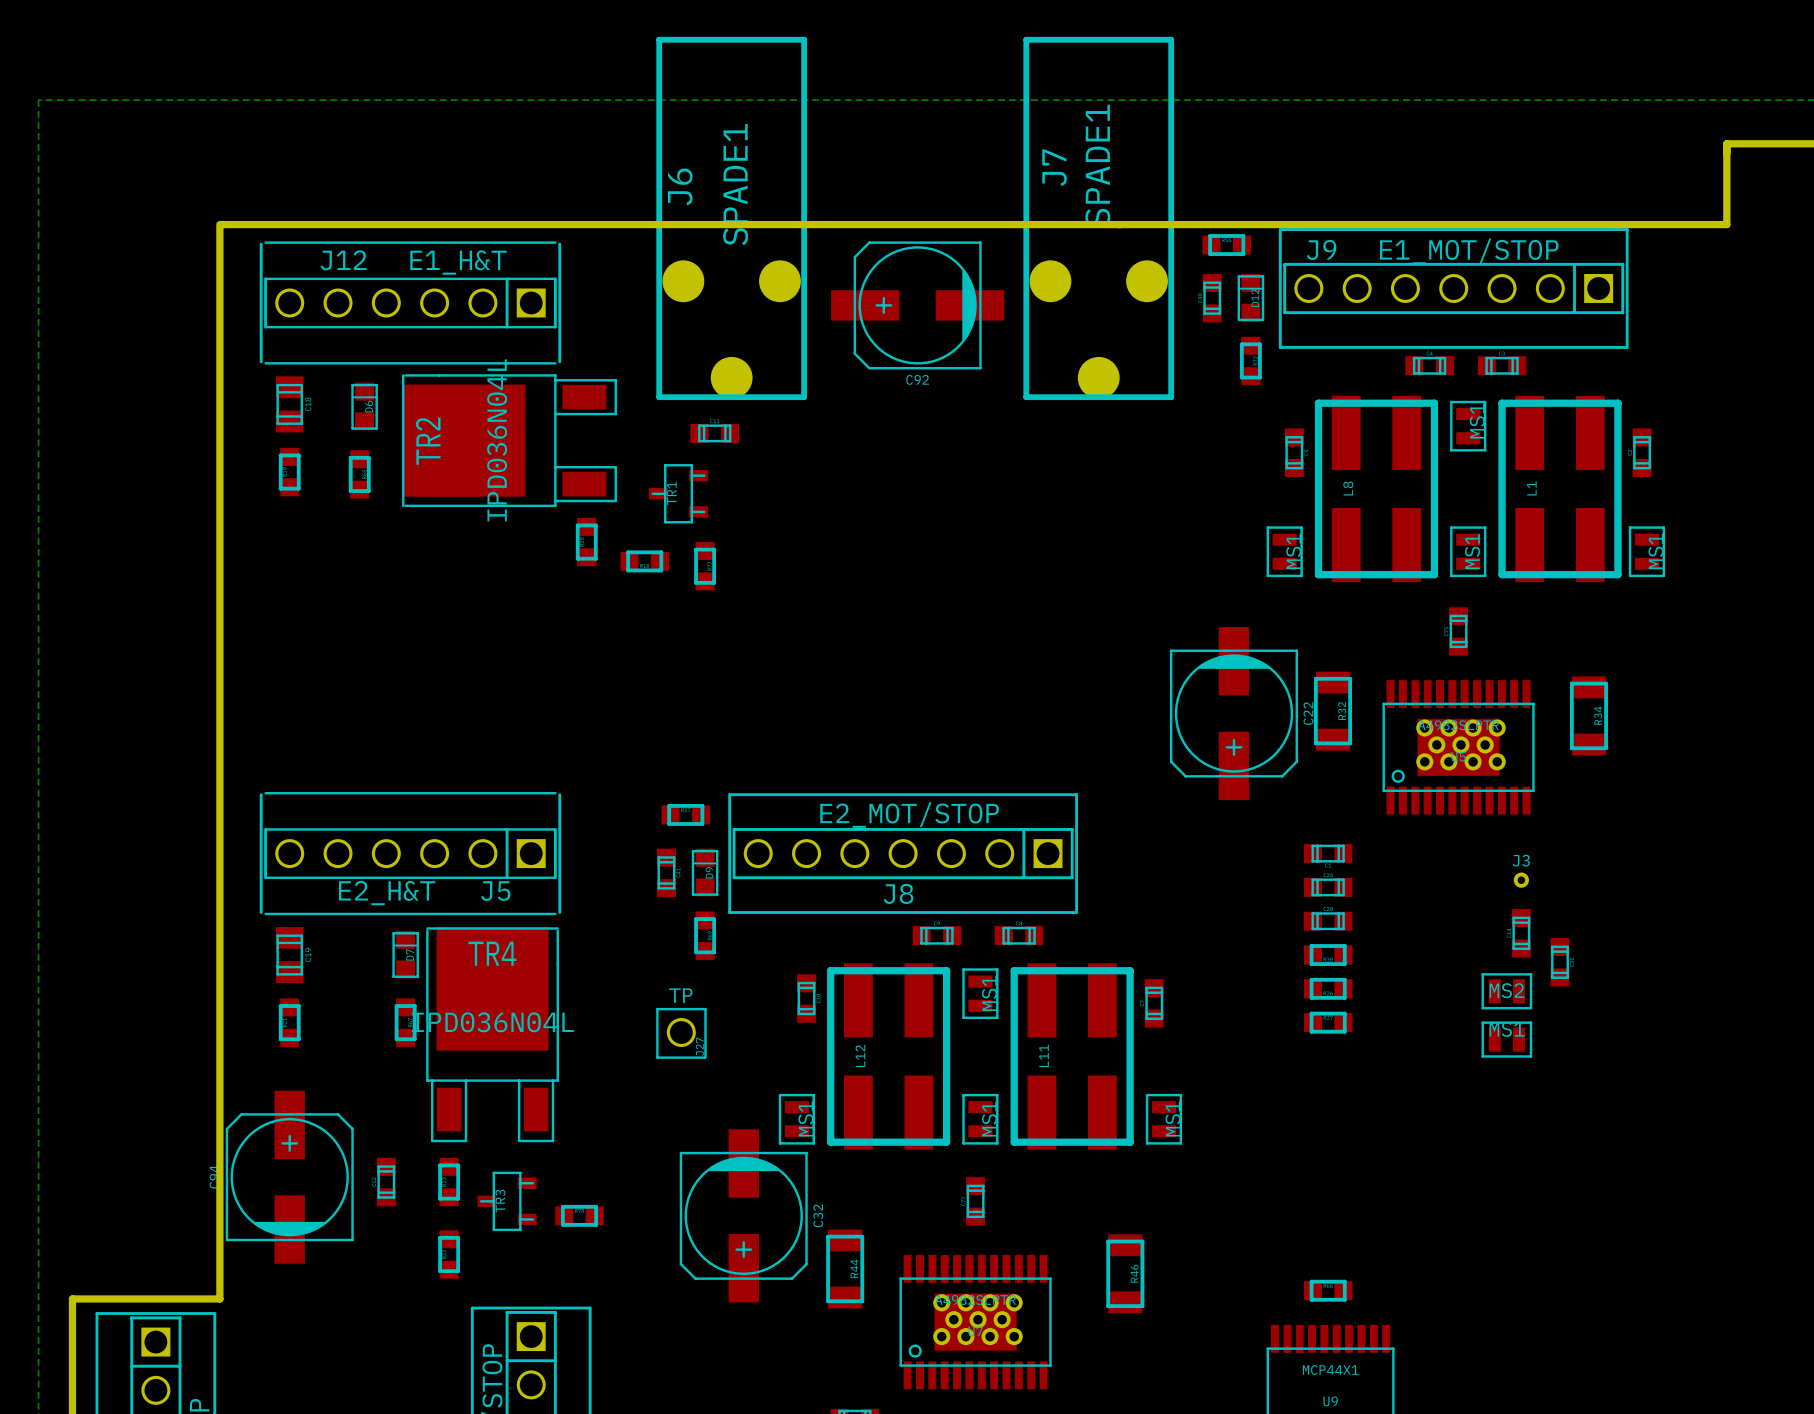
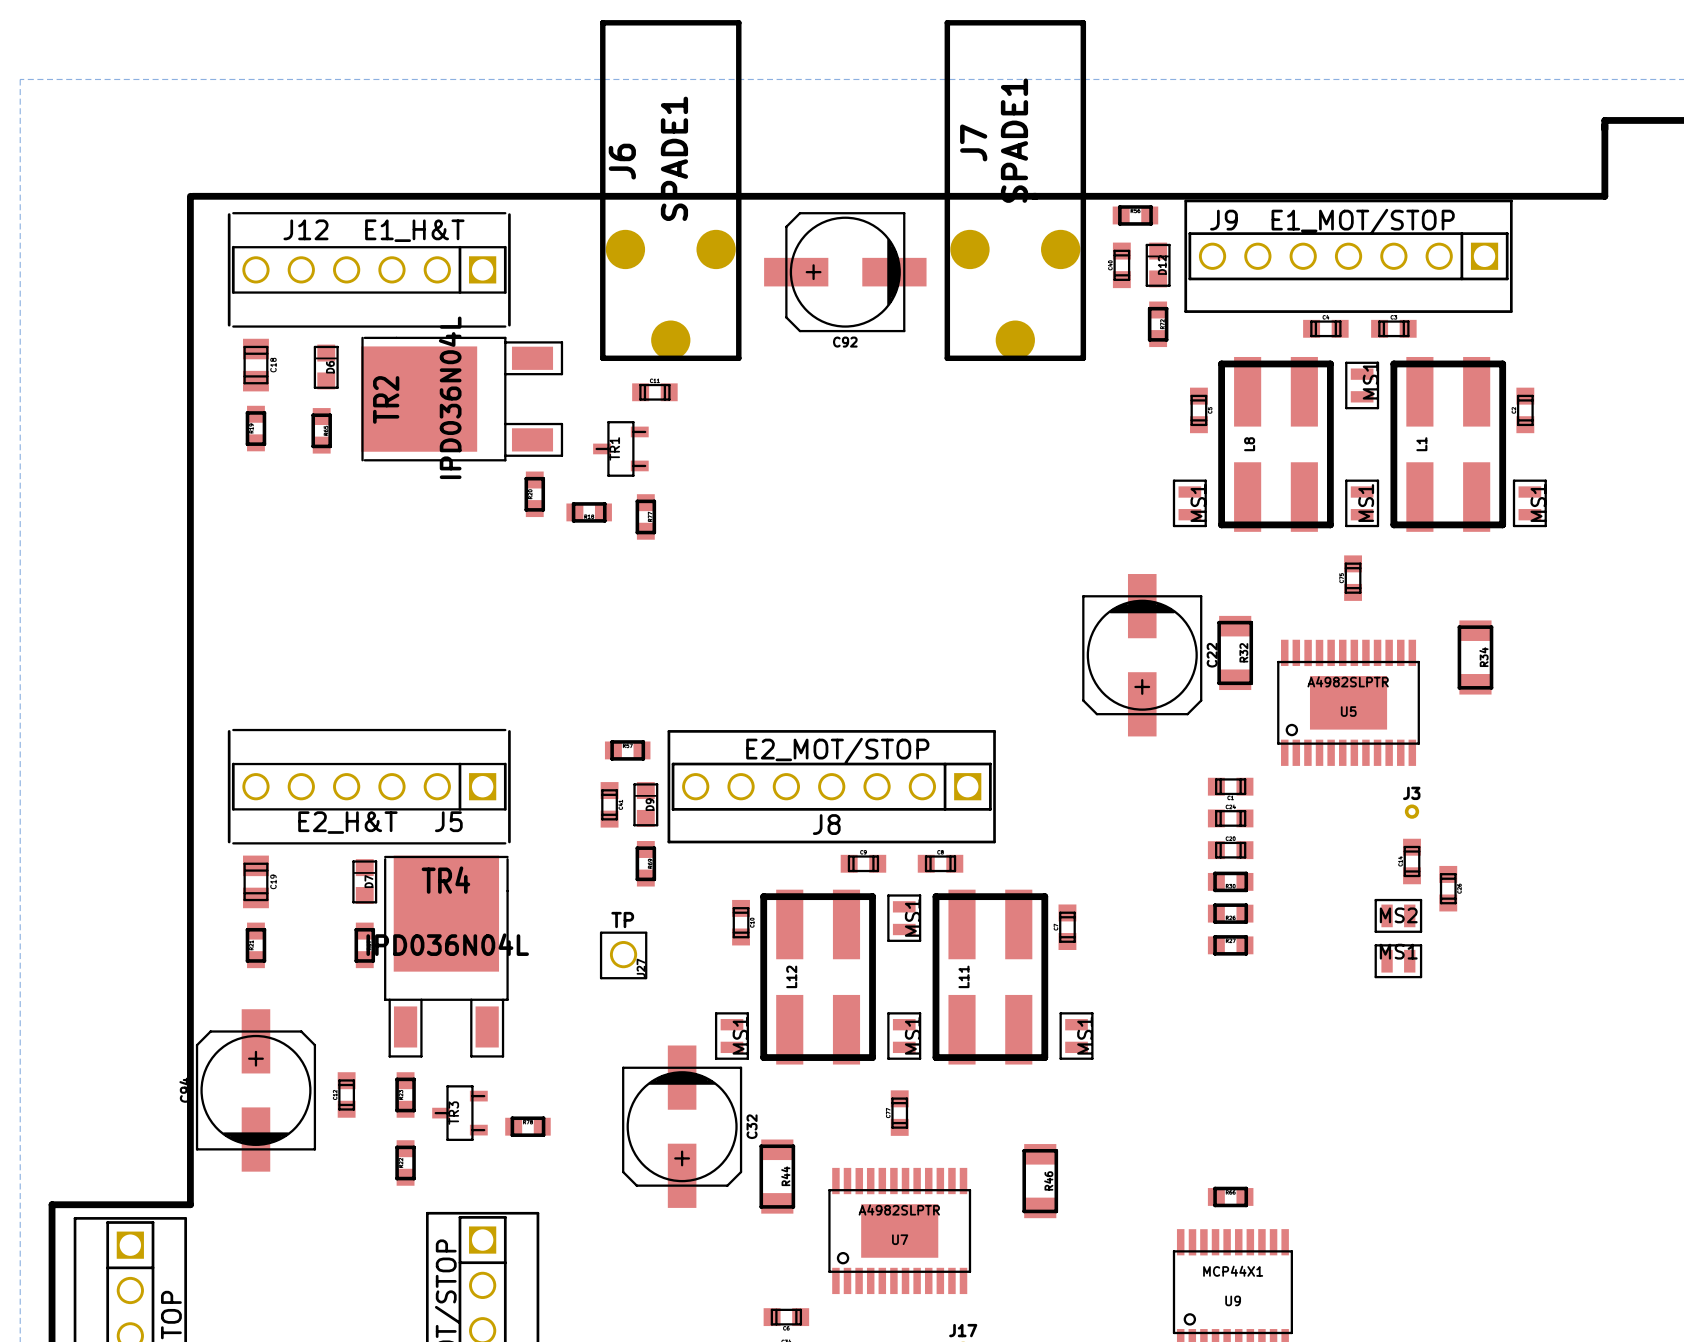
U5 footprint: [1382, 680, 1535, 815] -> [1277, 639, 1420, 766]
U7 footprint: [899, 1254, 1052, 1390] -> [828, 1167, 972, 1295]

